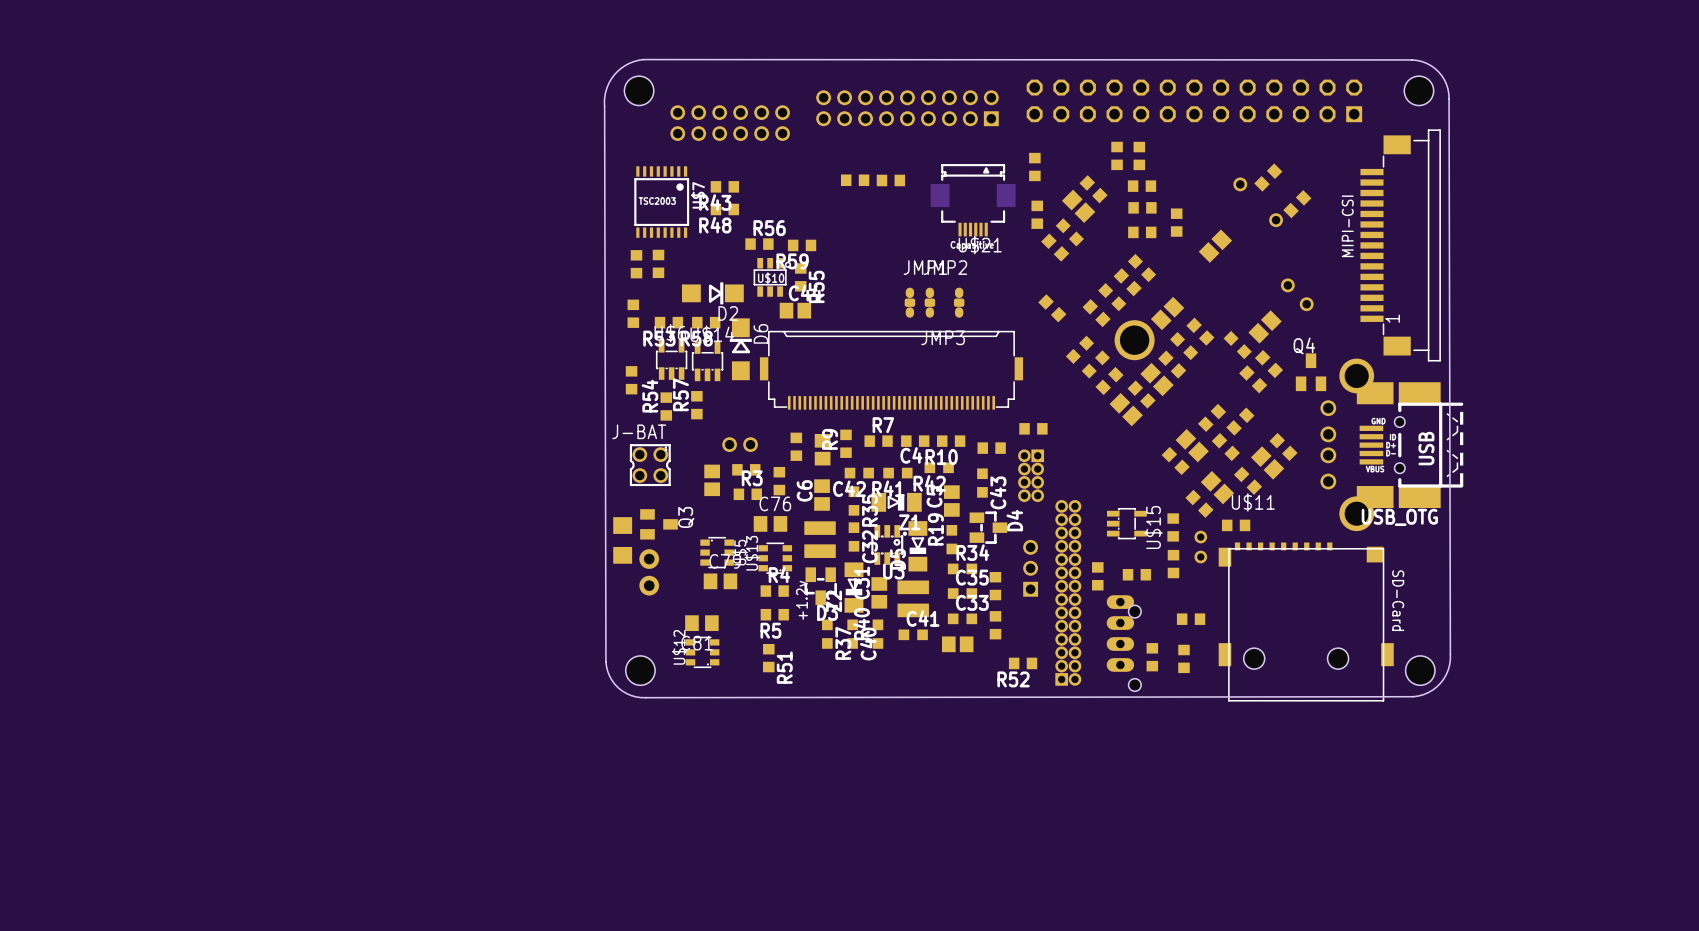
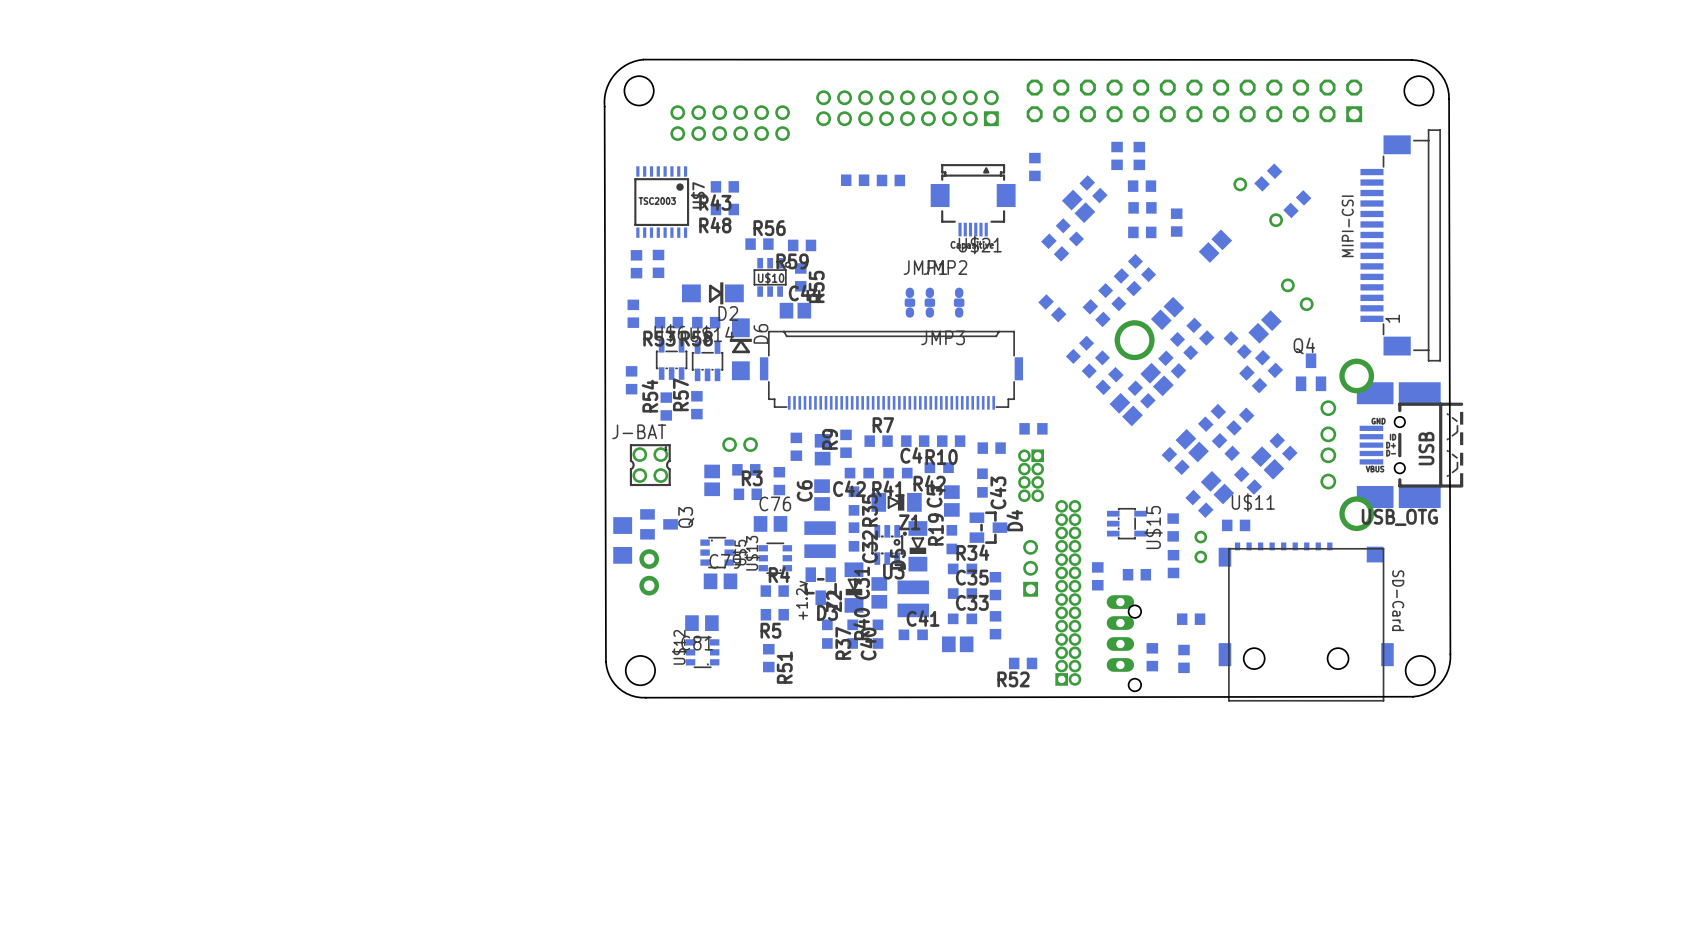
part: (1037, 214) -> none

